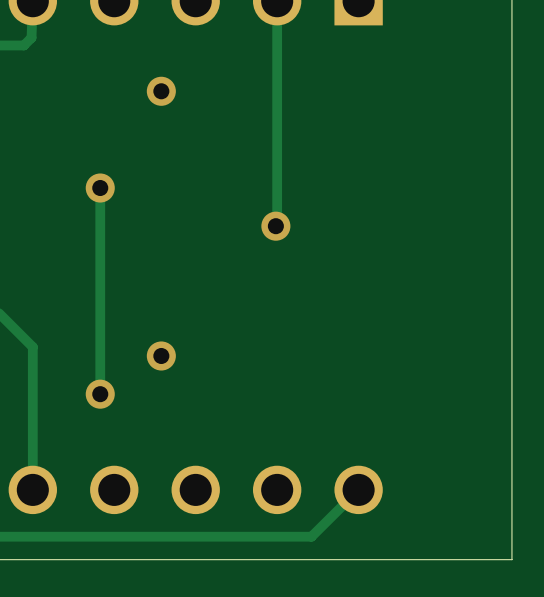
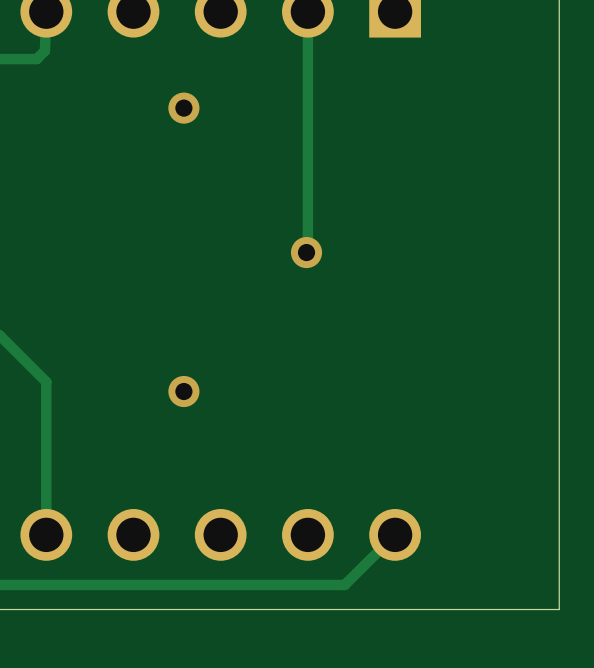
track: (100, 188) (100, 394) -> none
via: (100, 188) -> none
via: (100, 394) -> none

